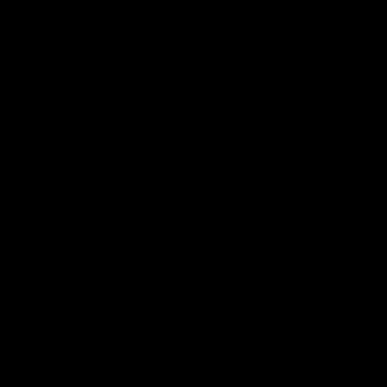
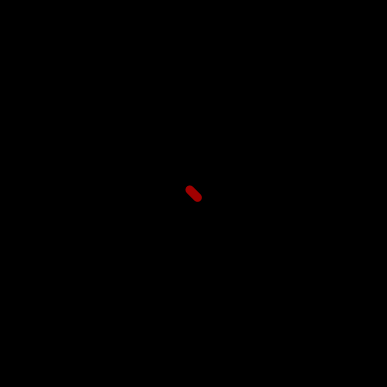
top track: none -> (189, 189) (197, 197)

